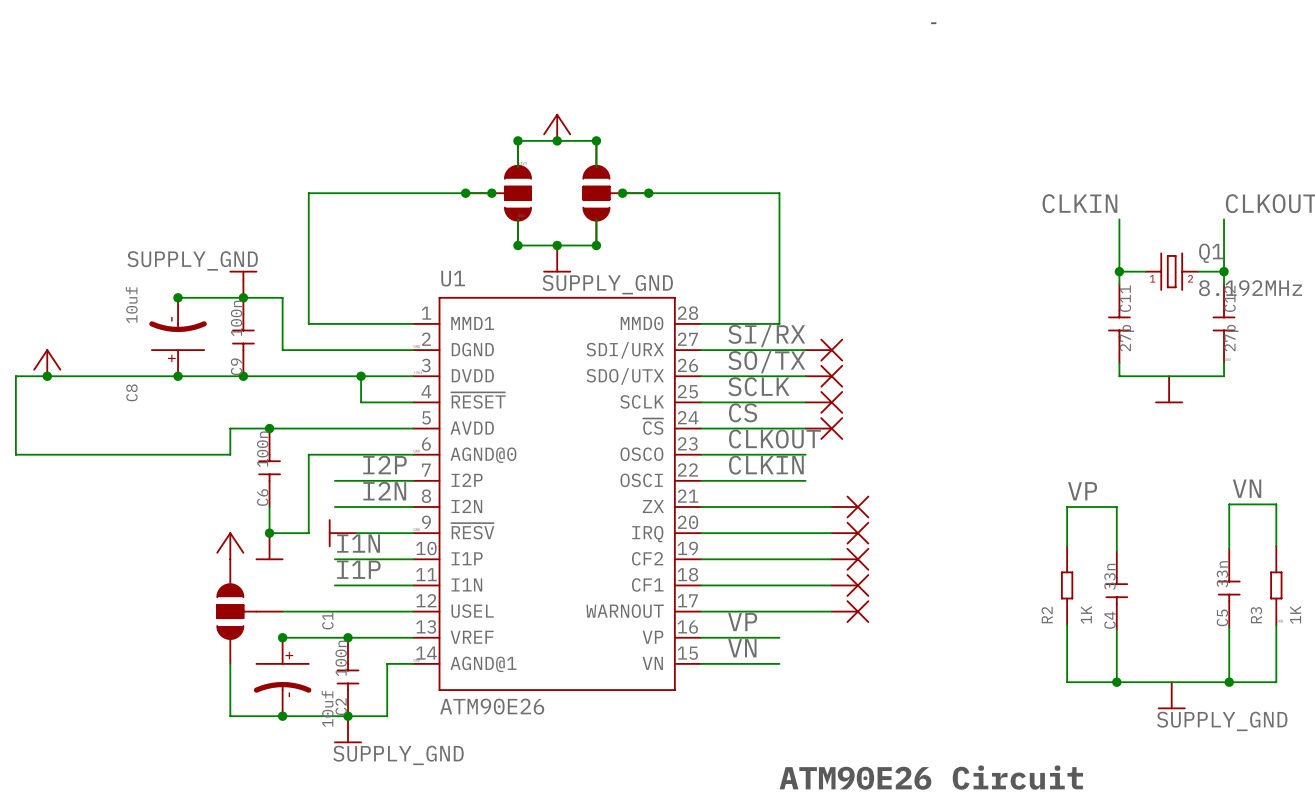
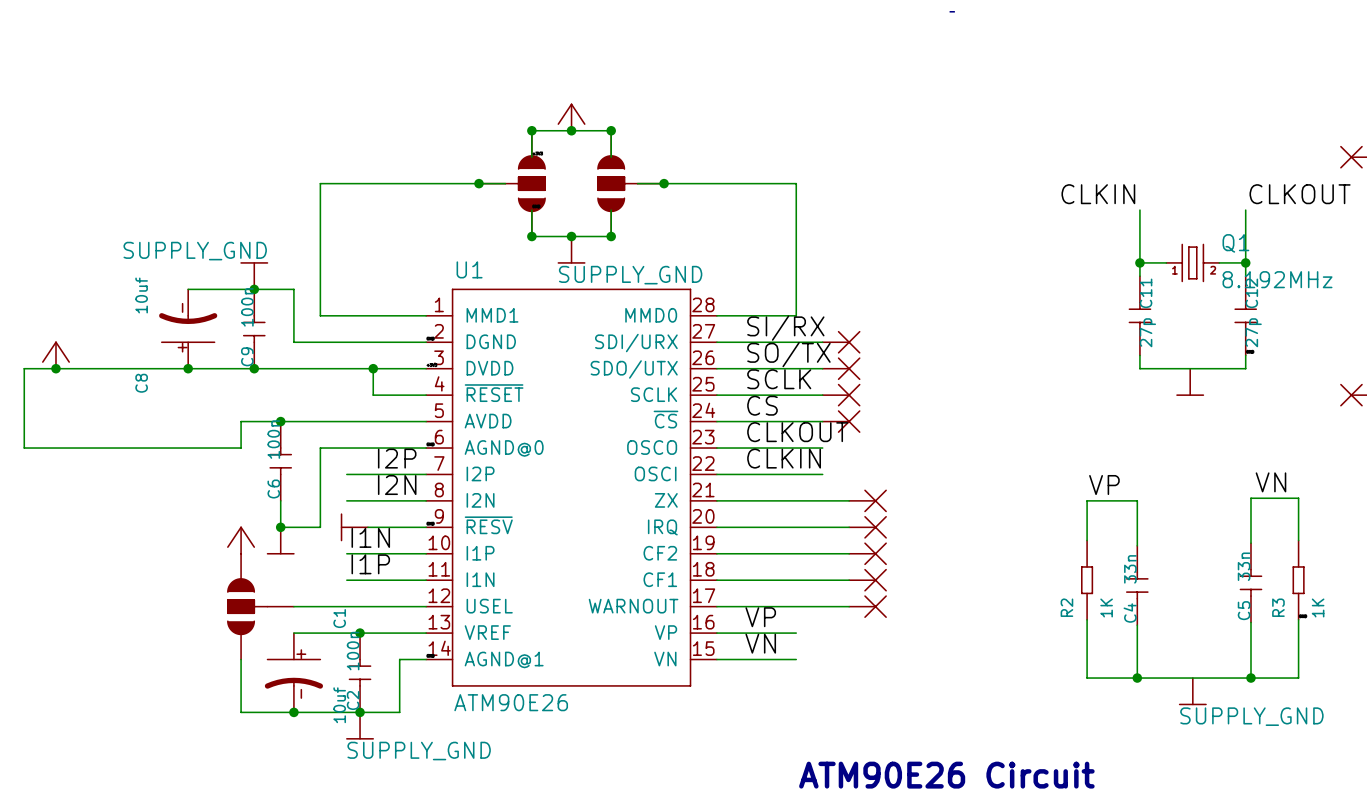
junction: (491, 193) -> none
junction: (622, 193) -> none
junction: (178, 297) -> none
junction: (282, 637) -> none

